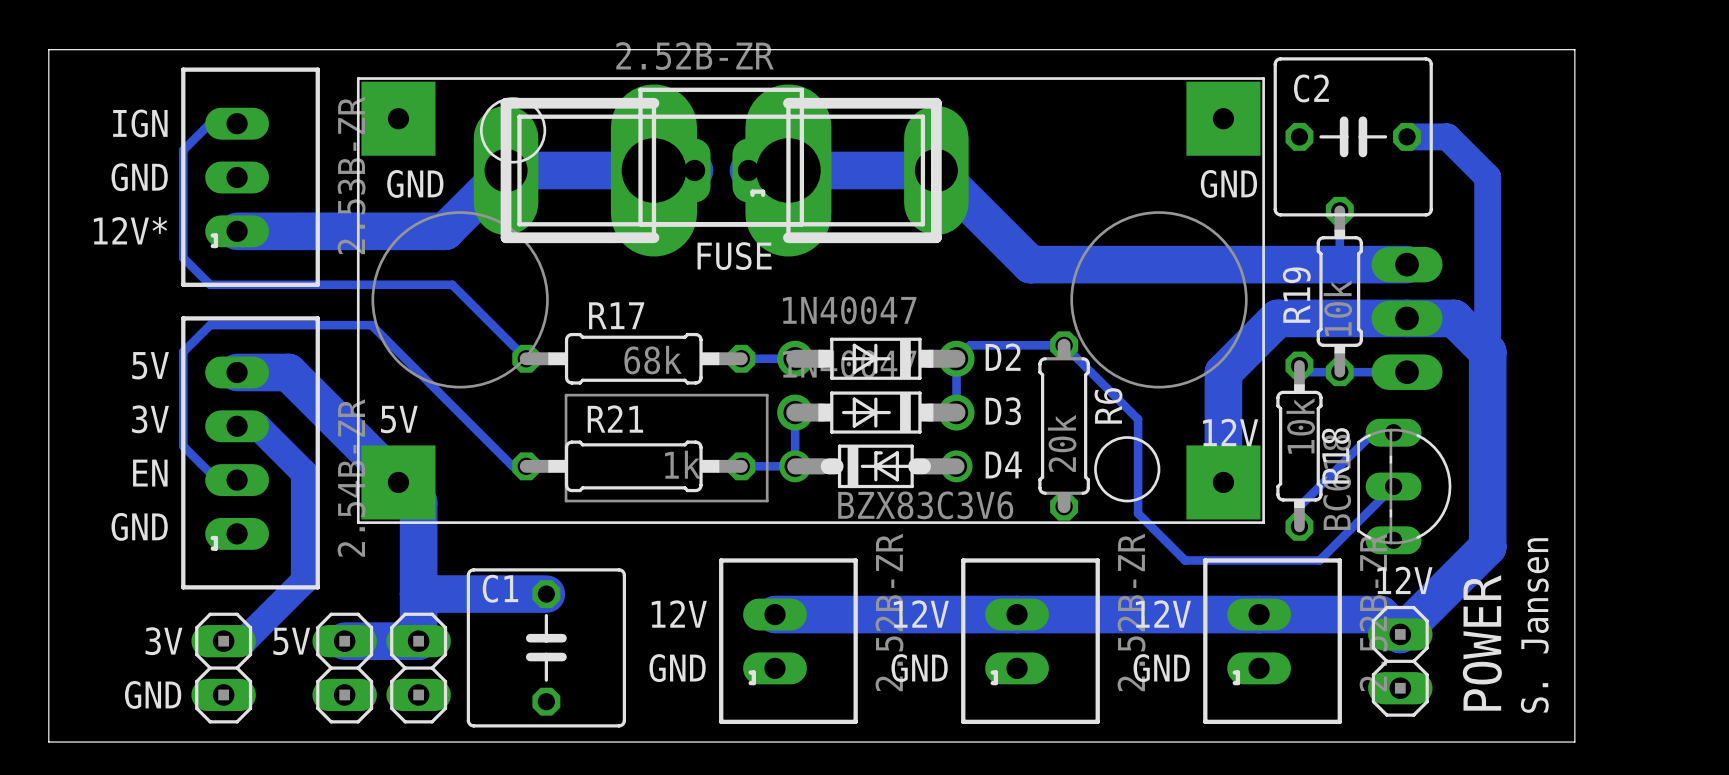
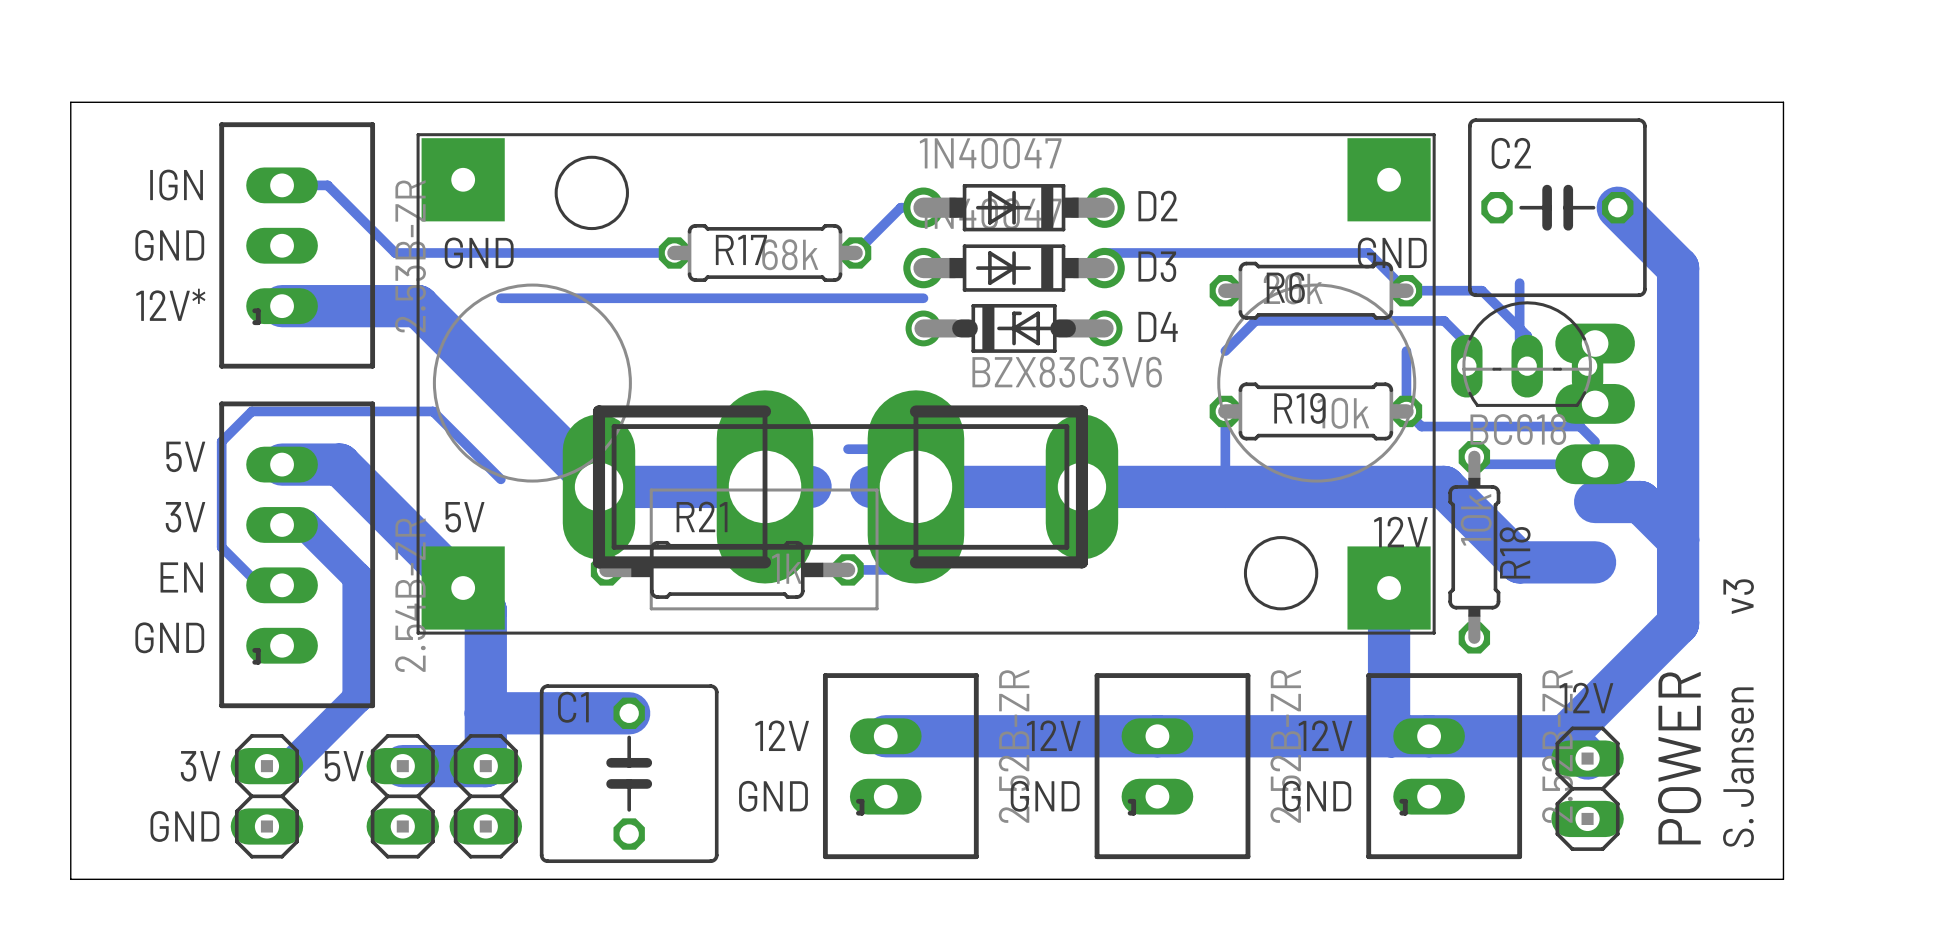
bottom track: (237, 123) (209, 123) (183, 150) (183, 257) (210, 284) (452, 284) (526, 358) -> (282, 185) (327, 185) (395, 252) (674, 252)
C2 position: (1353, 136) -> (1557, 207)
bottom track: (1407, 136) (1447, 136) (1487, 177) (1487, 352) -> none
bottom track: none -> (923, 207) (900, 207) (855, 252)
bottom track: none -> (1617, 207) (1678, 268) (1678, 623) (1565, 736)
FUSE: 2.52B-ZR (721, 157) -> none
bottom track: (694, 170) (506, 170) (445, 231) (358, 231) -> (810, 486) (599, 486) (418, 306)
part position: (721, 170) -> (840, 486)
bottom track: (748, 170) (936, 170) (1030, 264) (1407, 264) -> none
bottom track: none -> (1104, 252) (1368, 252) (1406, 290) (1481, 290) (1527, 335) (1527, 366)
R19 footprint: [1316, 196, 1363, 387] -> [1209, 382, 1423, 441]
bottom track: none -> (500, 298) (923, 298)
bottom track: none -> (1225, 351) (1255, 320) (1444, 320) (1466, 343) (1466, 366)
bottom track: none -> (1406, 351) (1406, 411) (1421, 426) (1580, 426) (1595, 441)
R19 name position: R19 (1296, 295) -> R19 (1299, 408)
bottom track: none -> (1225, 411) (1225, 486)
R17 footprint: [512, 332, 756, 385] -> [658, 224, 872, 282]
bottom track: (1487, 352) (1454, 318) (1277, 318) (1223, 372) (1223, 482) -> (1391, 736) (1389, 733) (1389, 588)
bottom track: (1487, 352) (1487, 547) (1400, 634) -> none
D2 position: (875, 358) -> (1014, 207)
bottom track: (432, 385) (512, 466) (526, 466) -> none
bottom track: none -> (871, 486) (1444, 486) (1519, 562) (1595, 562)
R6 name position: R6 (1108, 405) -> R6 (1285, 287)
bottom track: none -> (1595, 502) (1640, 502) (1678, 539)
D3 position: (875, 412) -> (1014, 268)
bottom track: (956, 412) (956, 358) (969, 345) (1064, 345) (1138, 419) (1138, 513) (1185, 560) (1319, 560) (1393, 486) -> none
R6 rotation: 0° (1064, 426) -> 90° clockwise (1315, 290)
R6 position: (1064, 426) -> (1315, 290)
bottom track: (1393, 432) (1373, 432) (1299, 506) (1299, 526) -> none
D4 position: (875, 466) -> (1014, 328)
part rotation: 0° (1404, 486) -> 90° counterclockwise (1527, 354)
part position: (1404, 486) -> (1527, 354)
text: none -> v3 (1738, 596)

